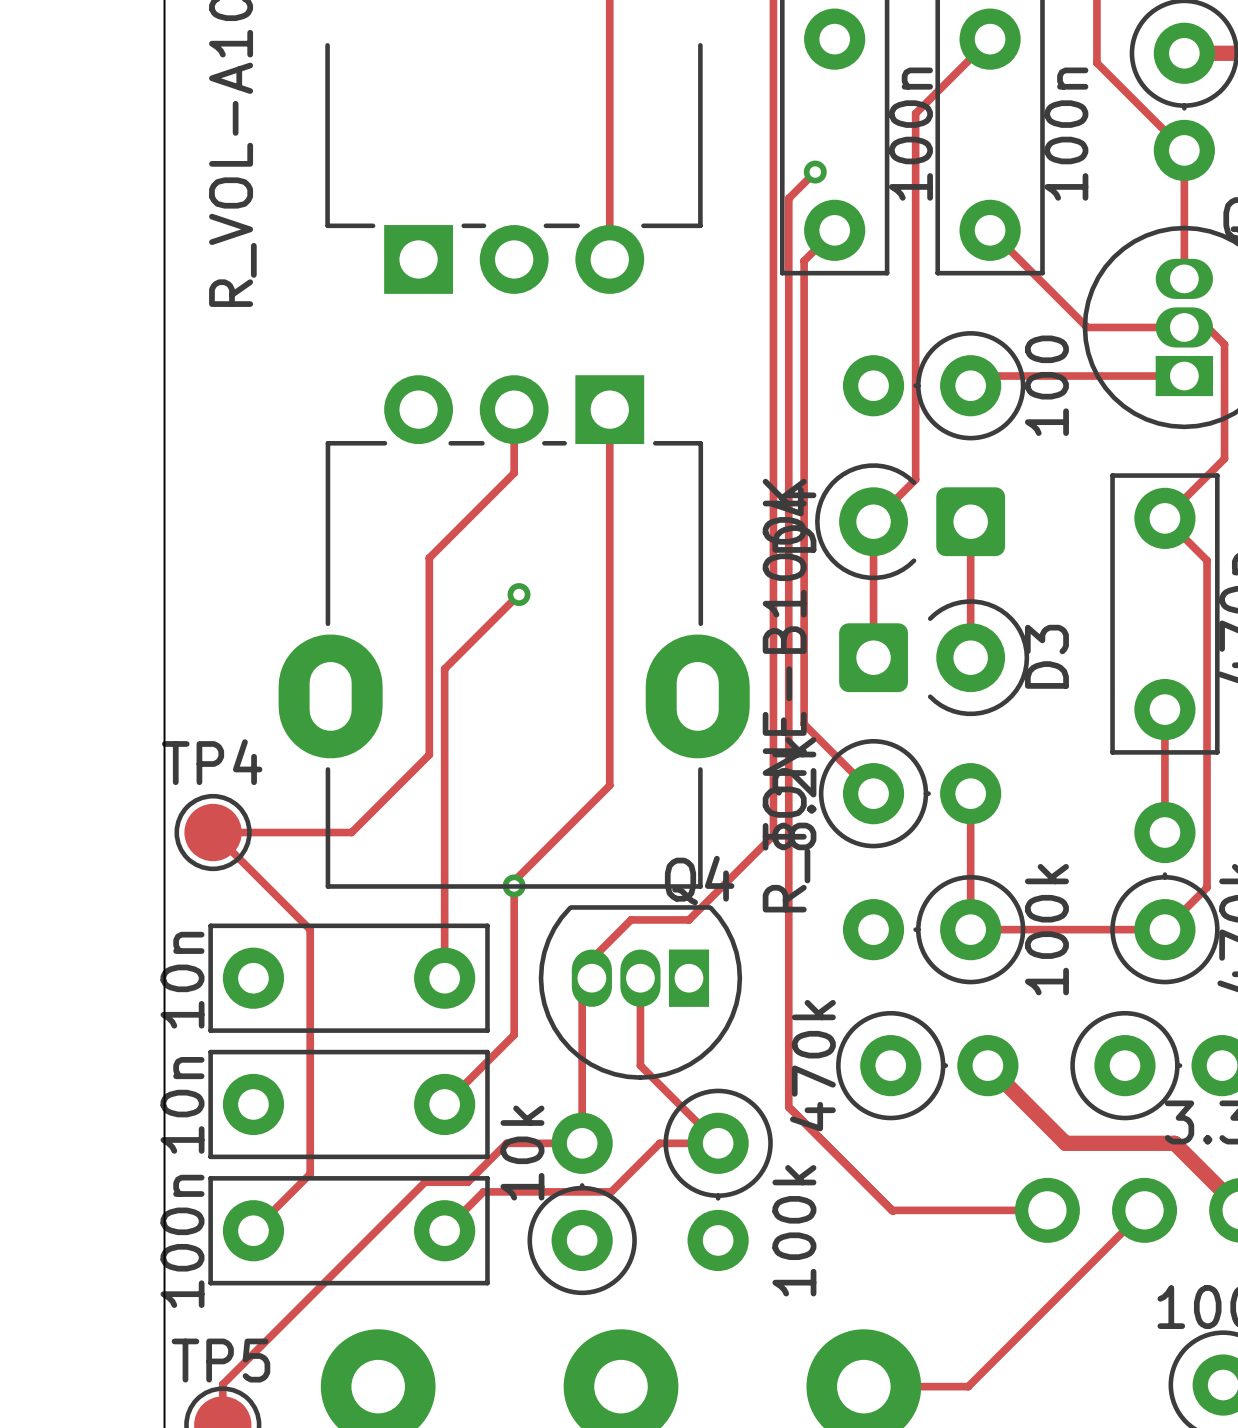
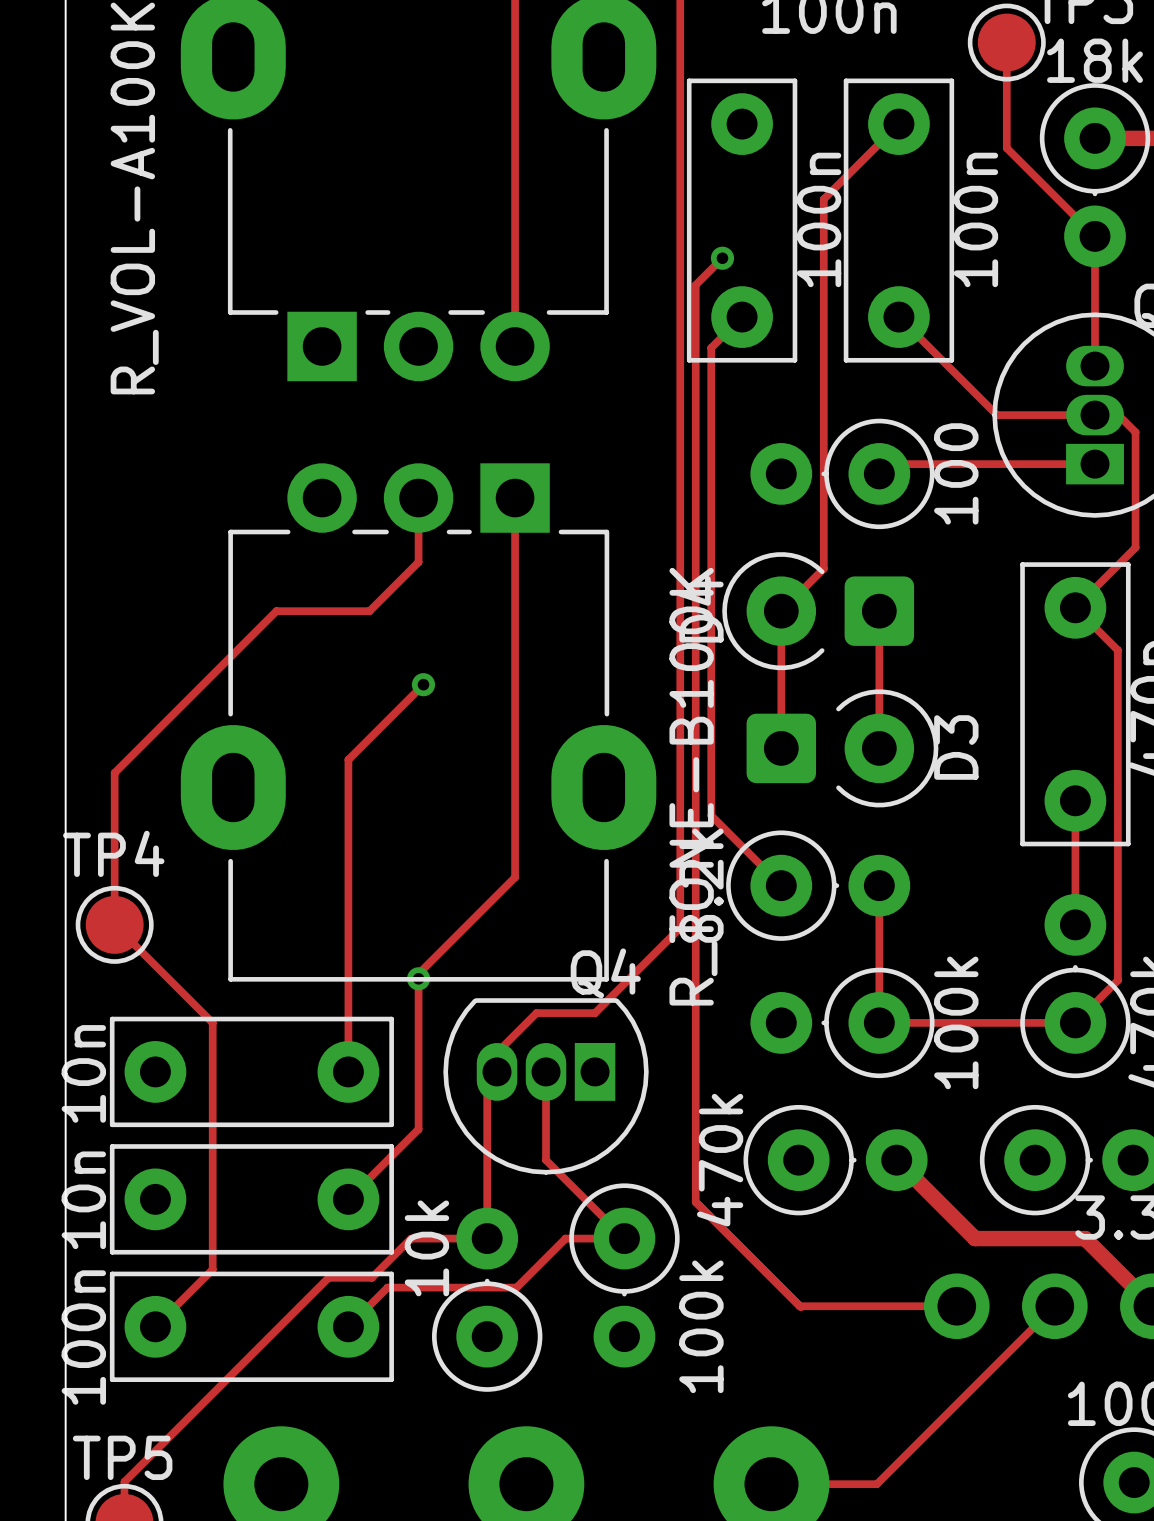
track: (465, 521) (429, 558) (429, 754) (351, 832) (213, 832) -> (369, 611) (276, 611) (114, 772) (114, 924)

